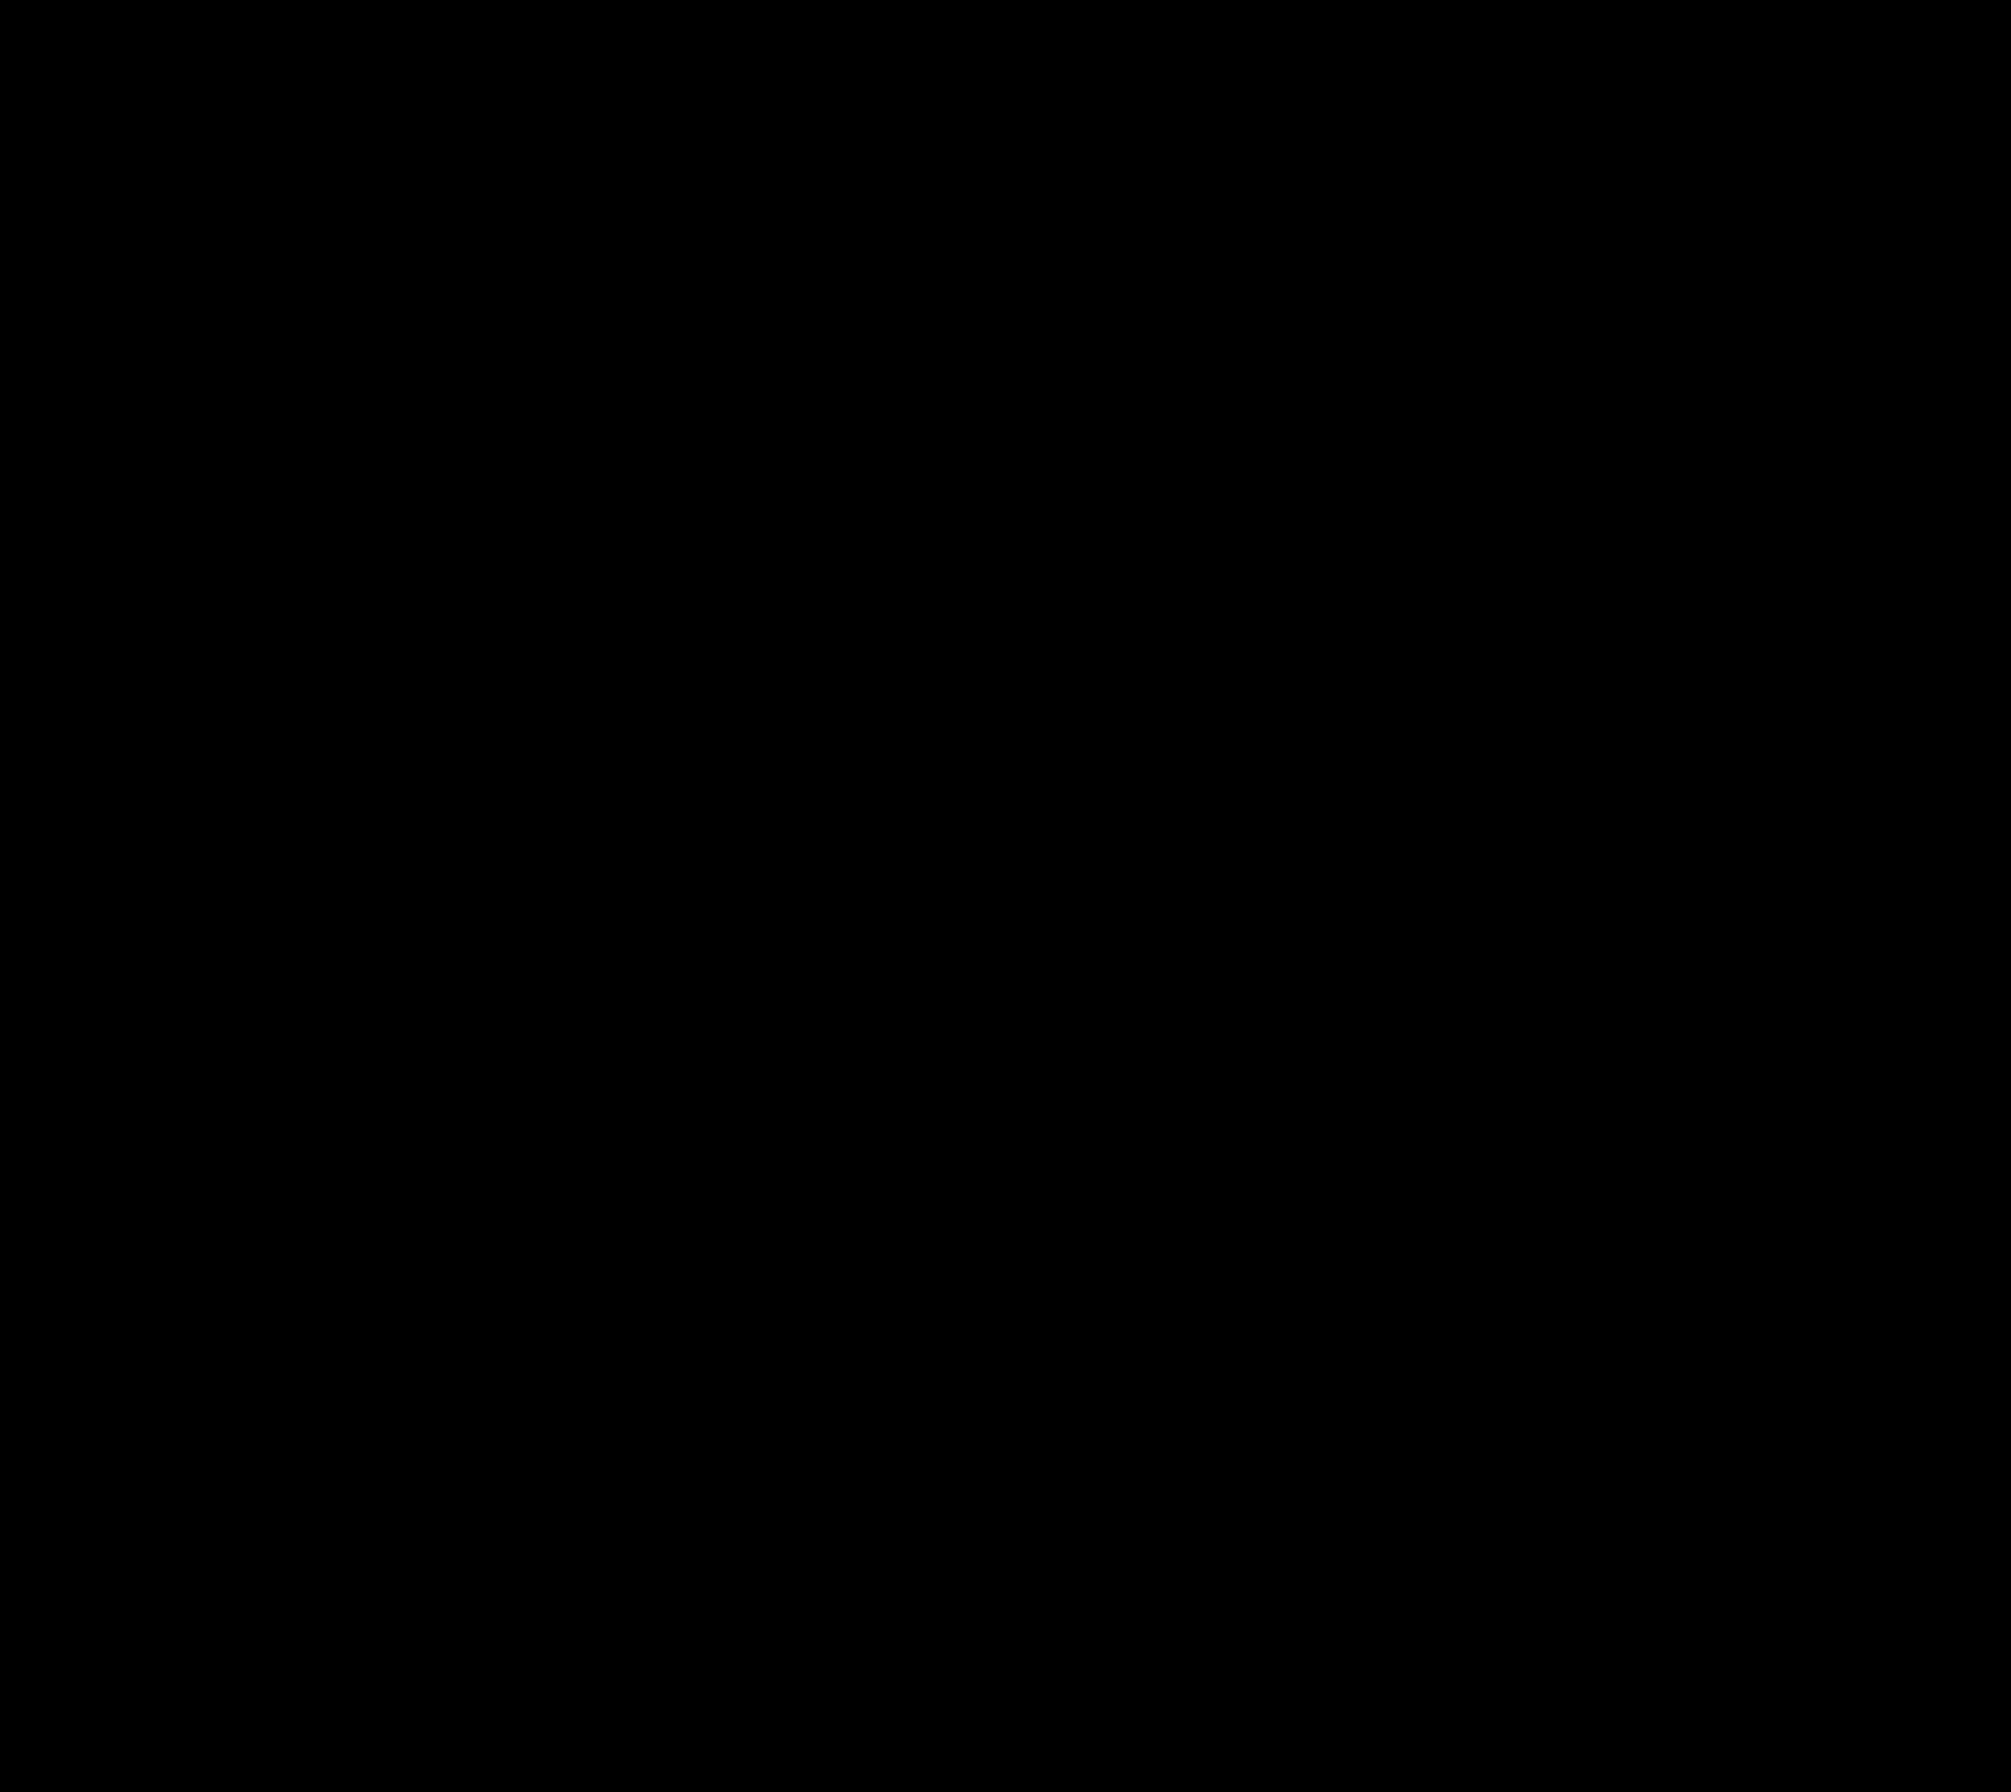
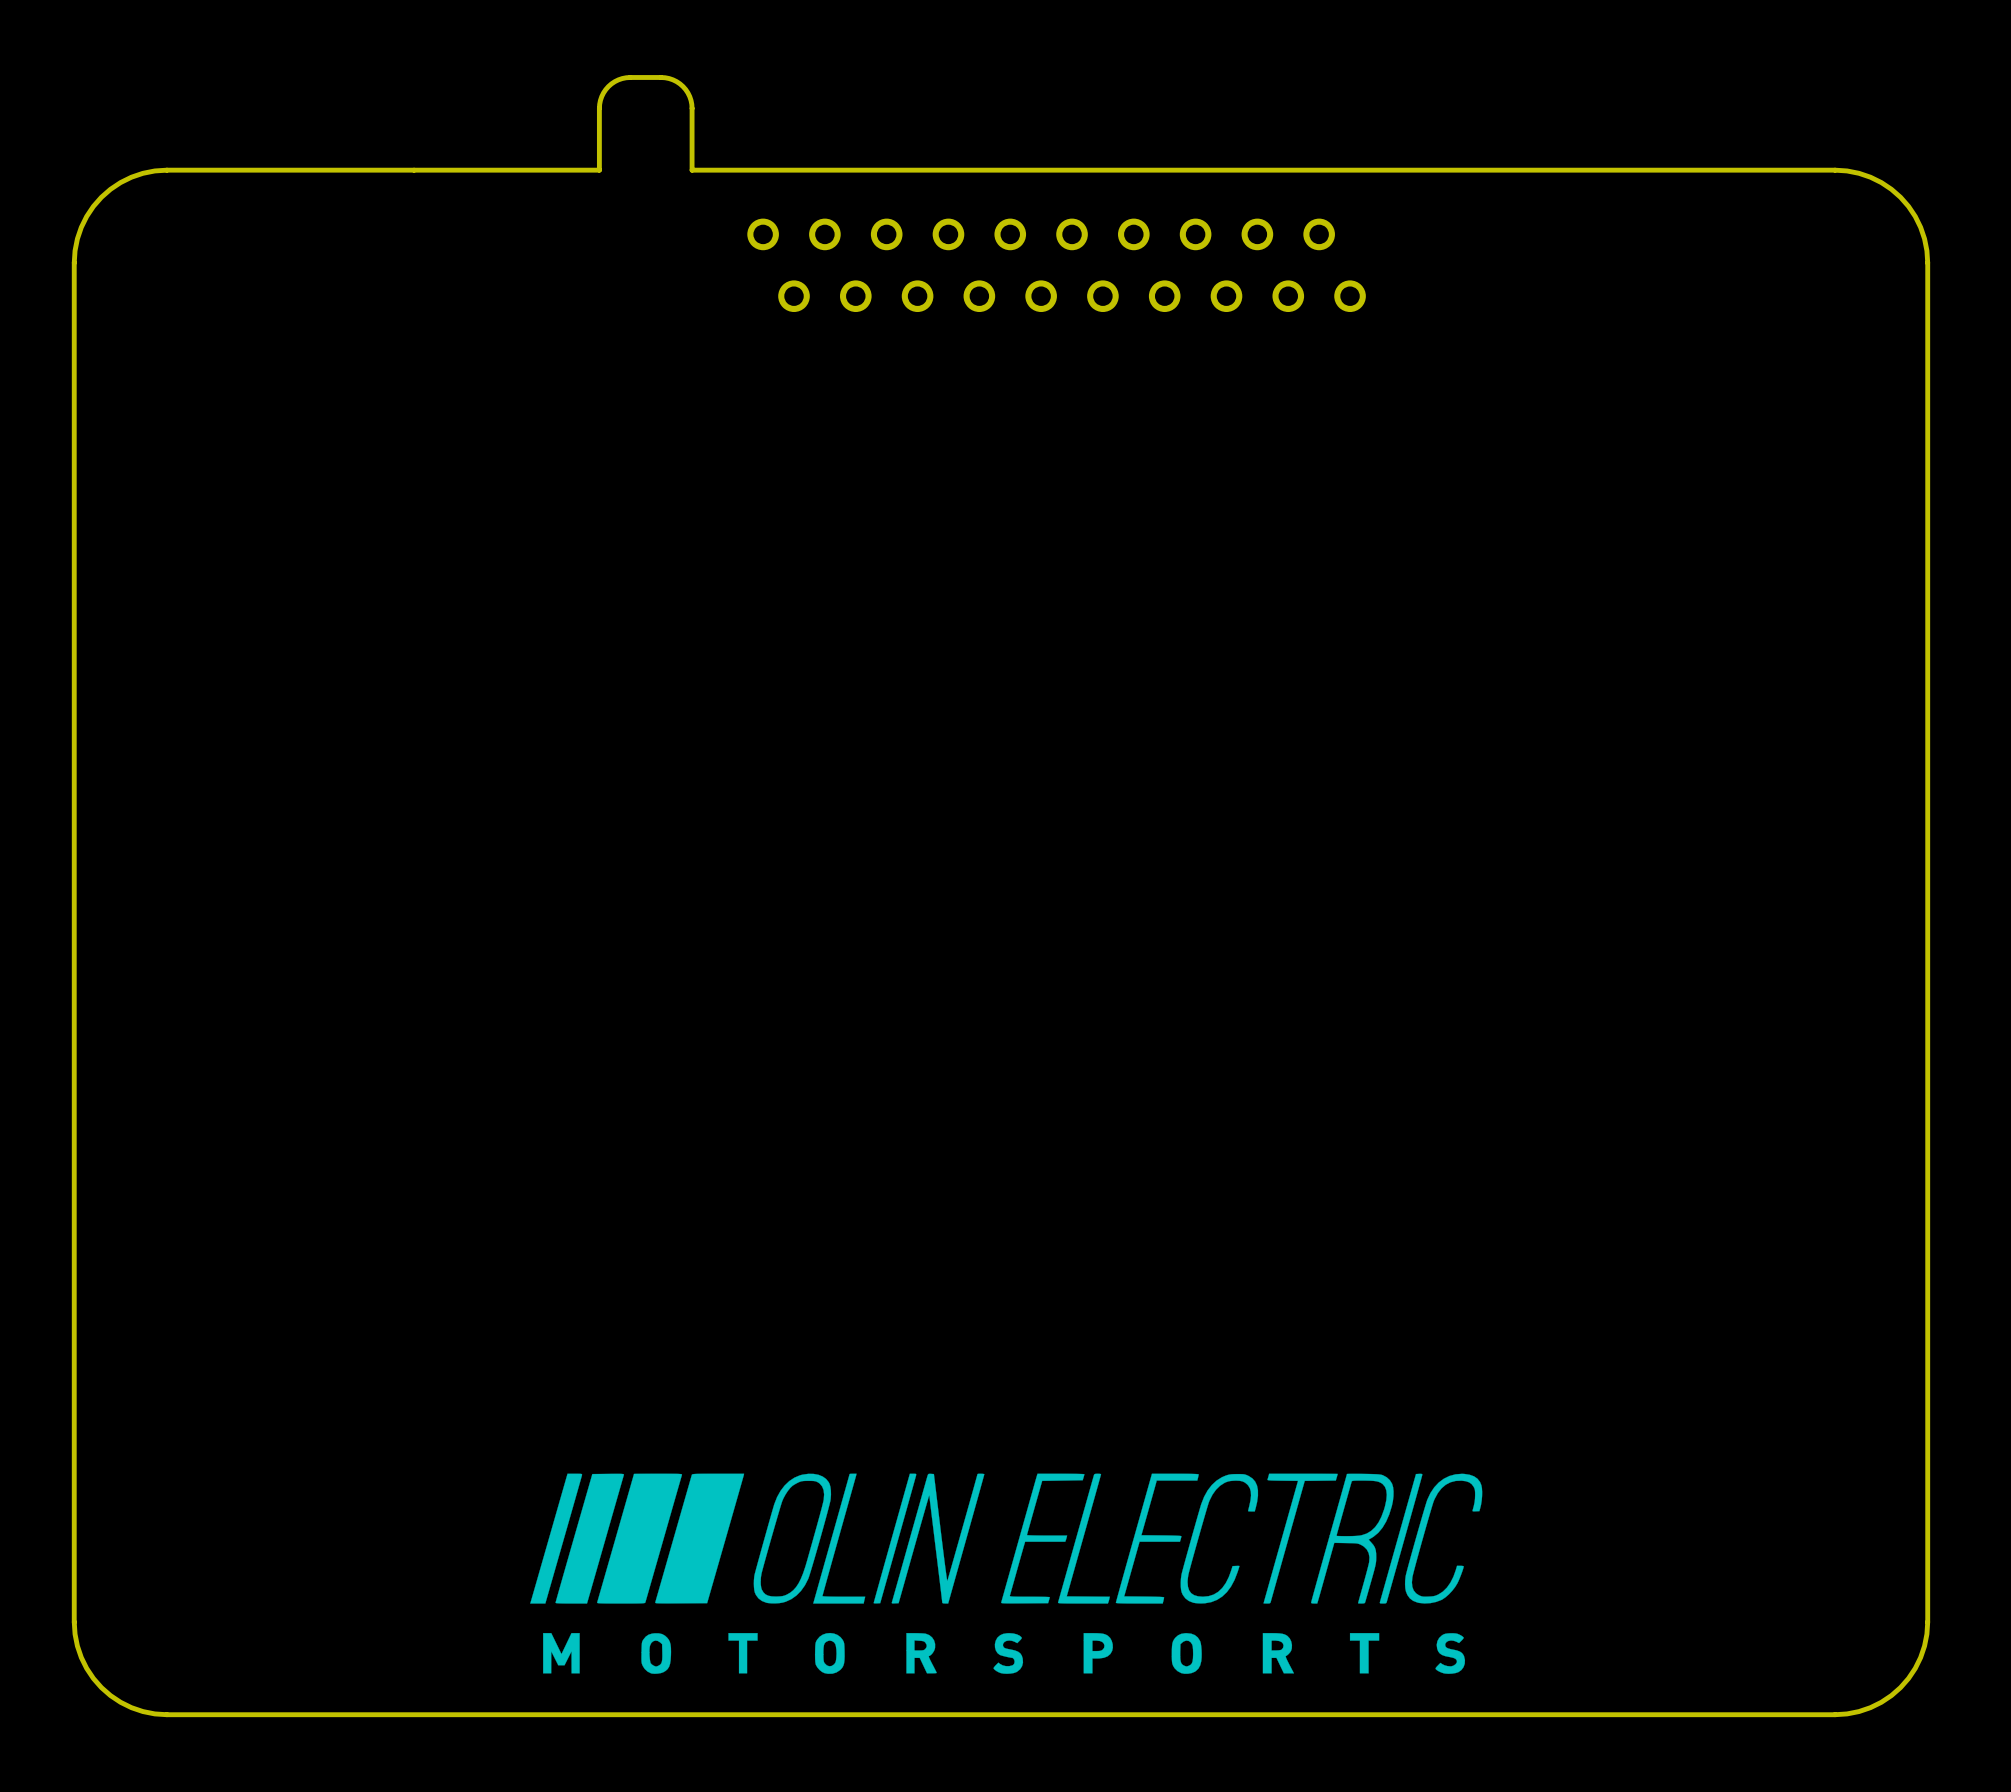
board edge: none -> (661, 77) (622, 78) (611, 83) (603, 92) (599, 108) (599, 170) (154, 170) (131, 177) (110, 189) (93, 206) (81, 227) (75, 250) (74, 262) (74, 1622) (75, 1634) (81, 1657) (93, 1678) (110, 1695) (131, 1707) (154, 1713) (166, 1714) (1835, 1714) (1847, 1713) (1870, 1707) (1891, 1695) (1900, 1687) (1915, 1668) (1924, 1646) (1927, 1622) (1927, 262) (1924, 238) (1920, 227) (1908, 206) (1891, 189) (1870, 177) (1859, 173) (1835, 170) (692, 170) (691, 100) (687, 92) (679, 83) (673, 79) (661, 77)
part: none -> (1056, 265)
drawing: none -> [530, 1473, 1483, 1674]

